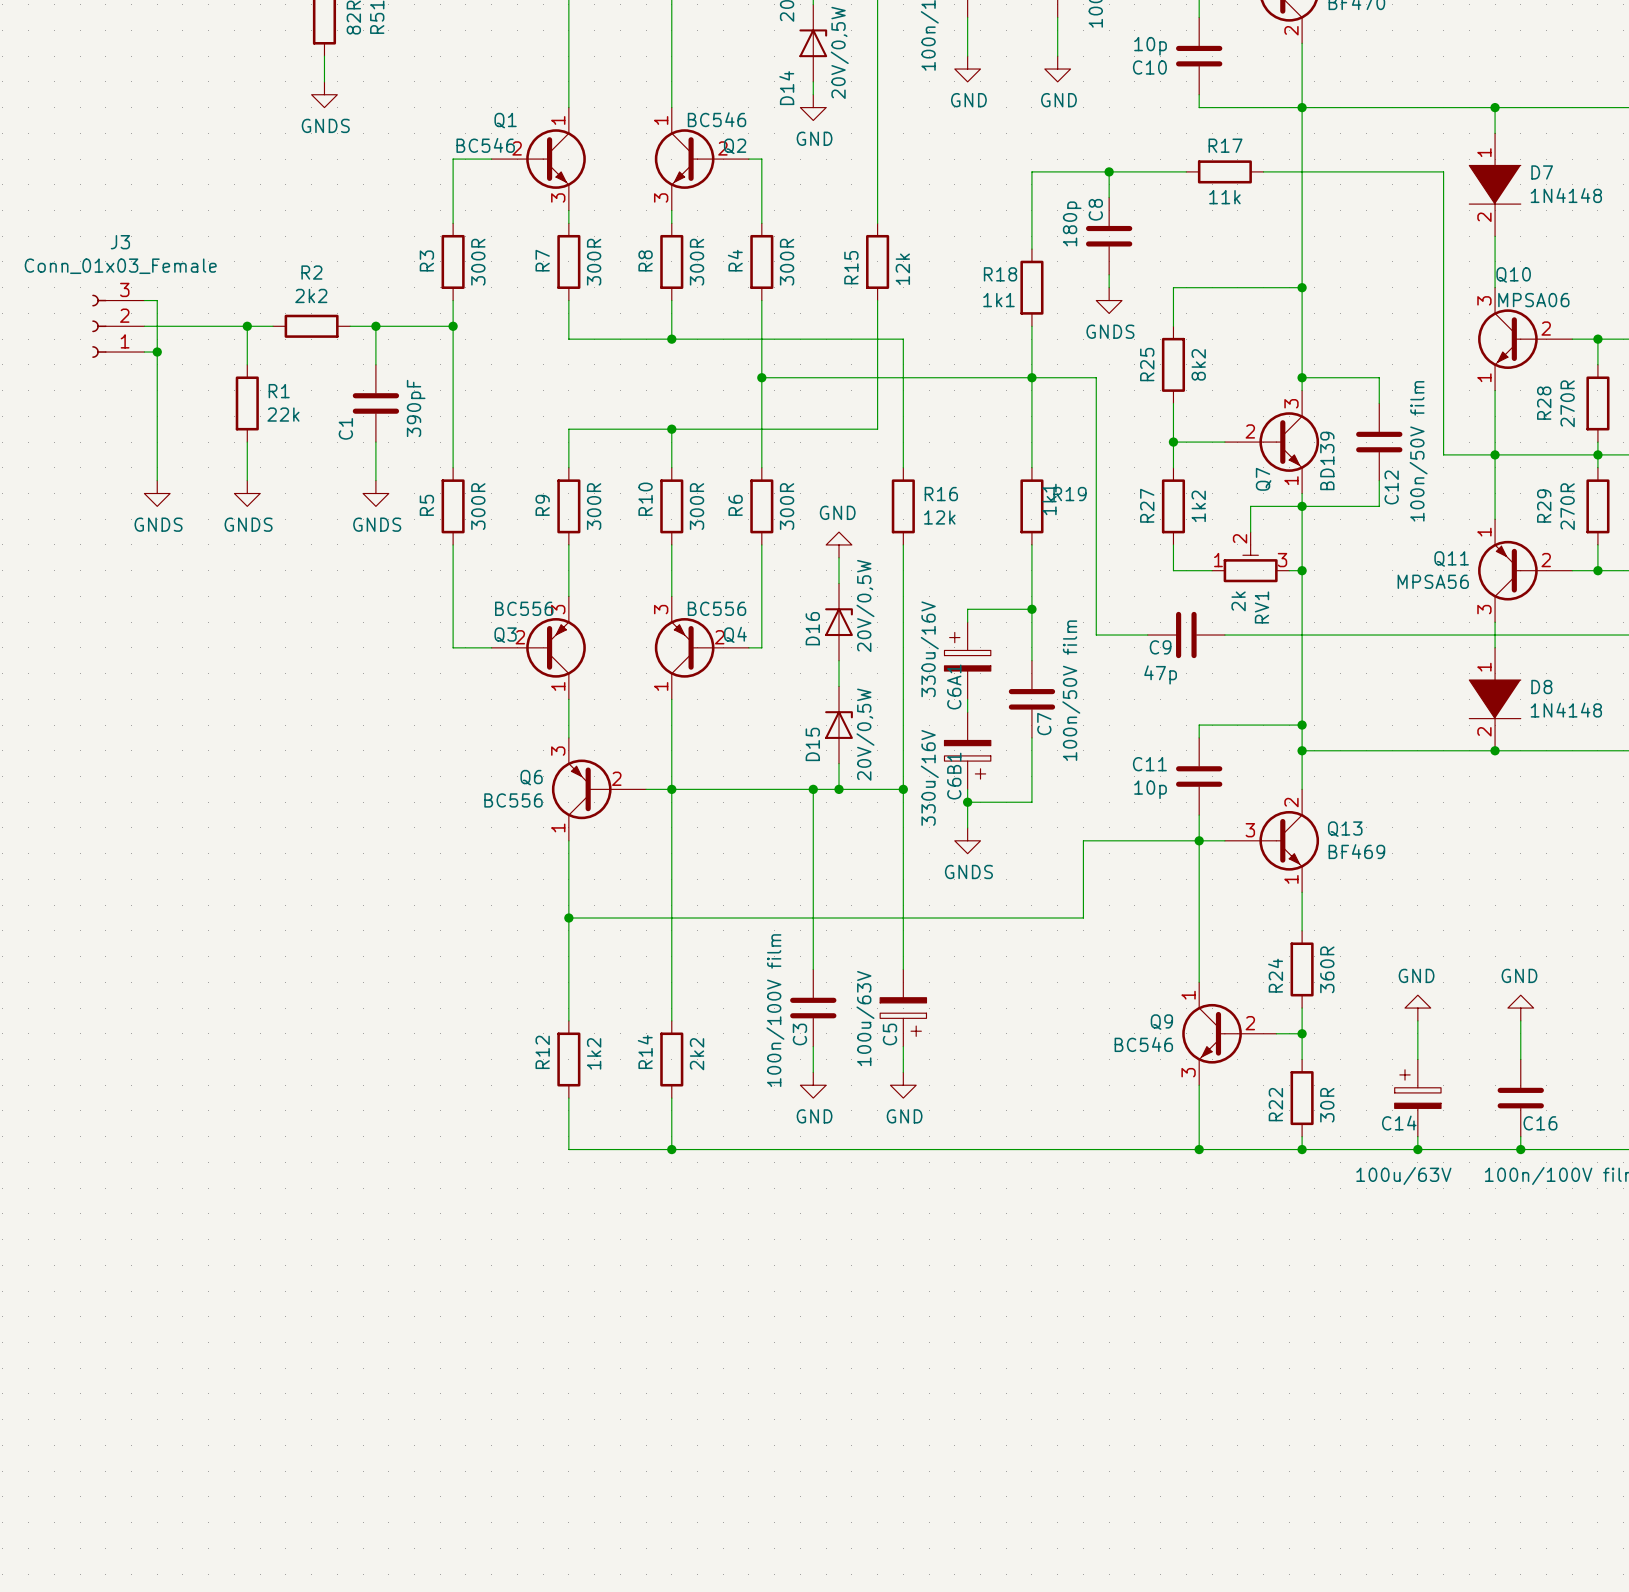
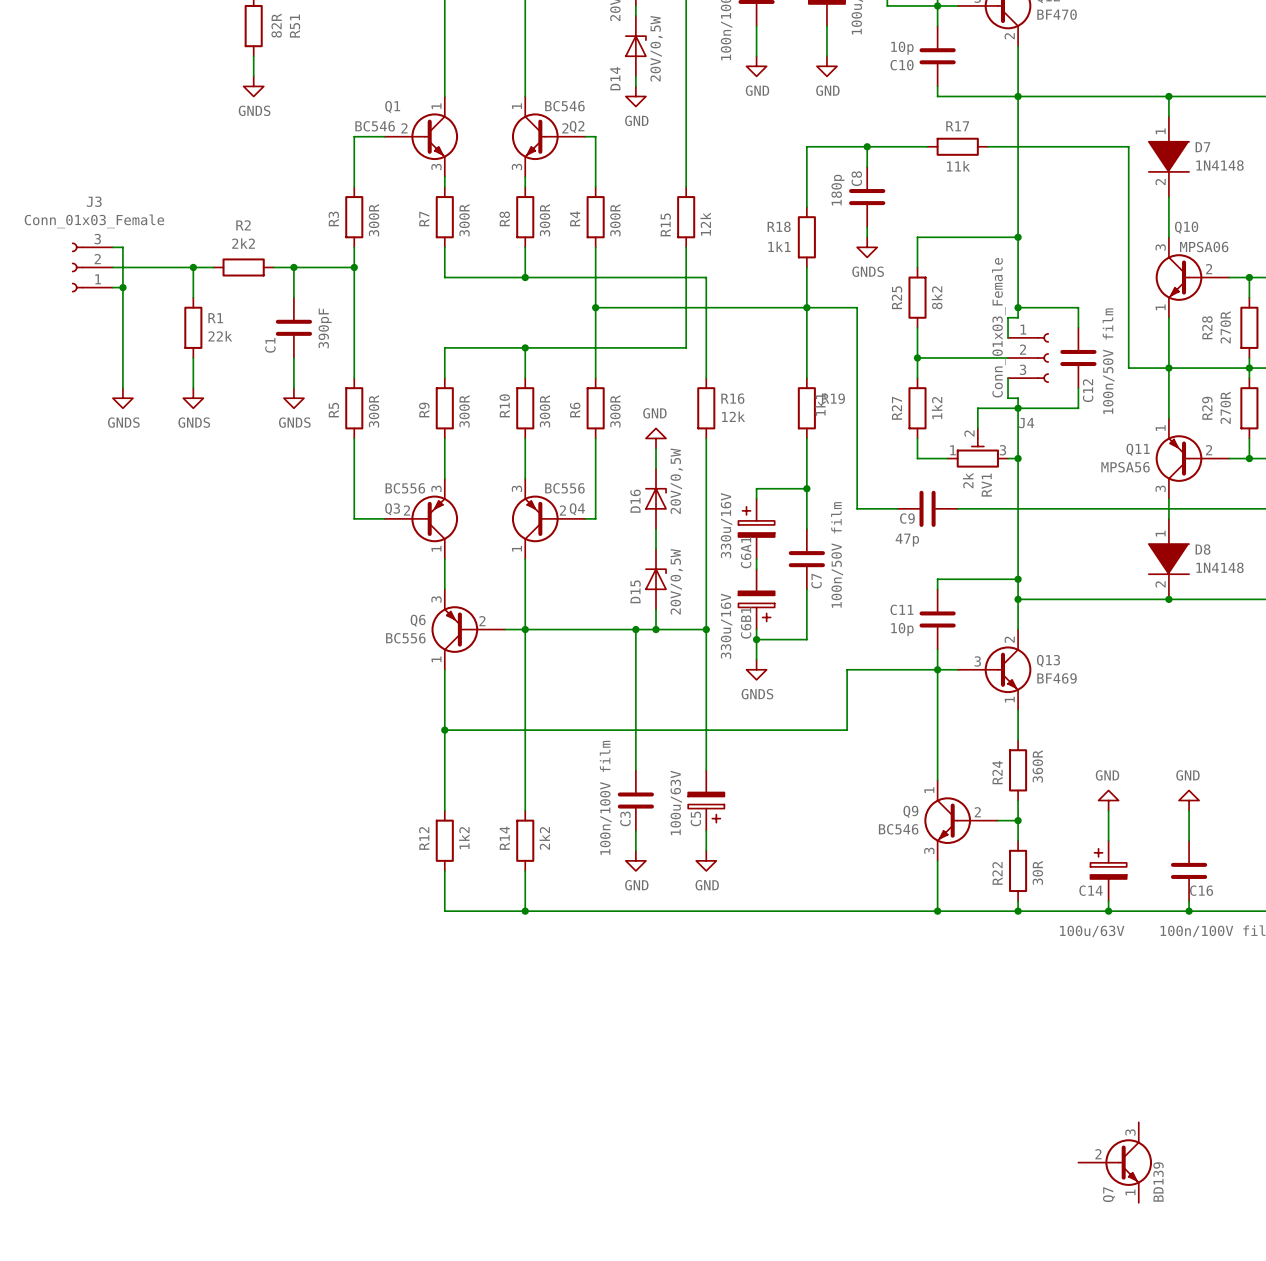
wire: none -> (1018, 317) (1008, 317) (1008, 337)
Q7 position: (1271, 442) -> (1115, 1162)
J4: none -> Conn_01x03_Female (1028, 357)
wire: none -> (1008, 378) (1008, 398) (1018, 398)

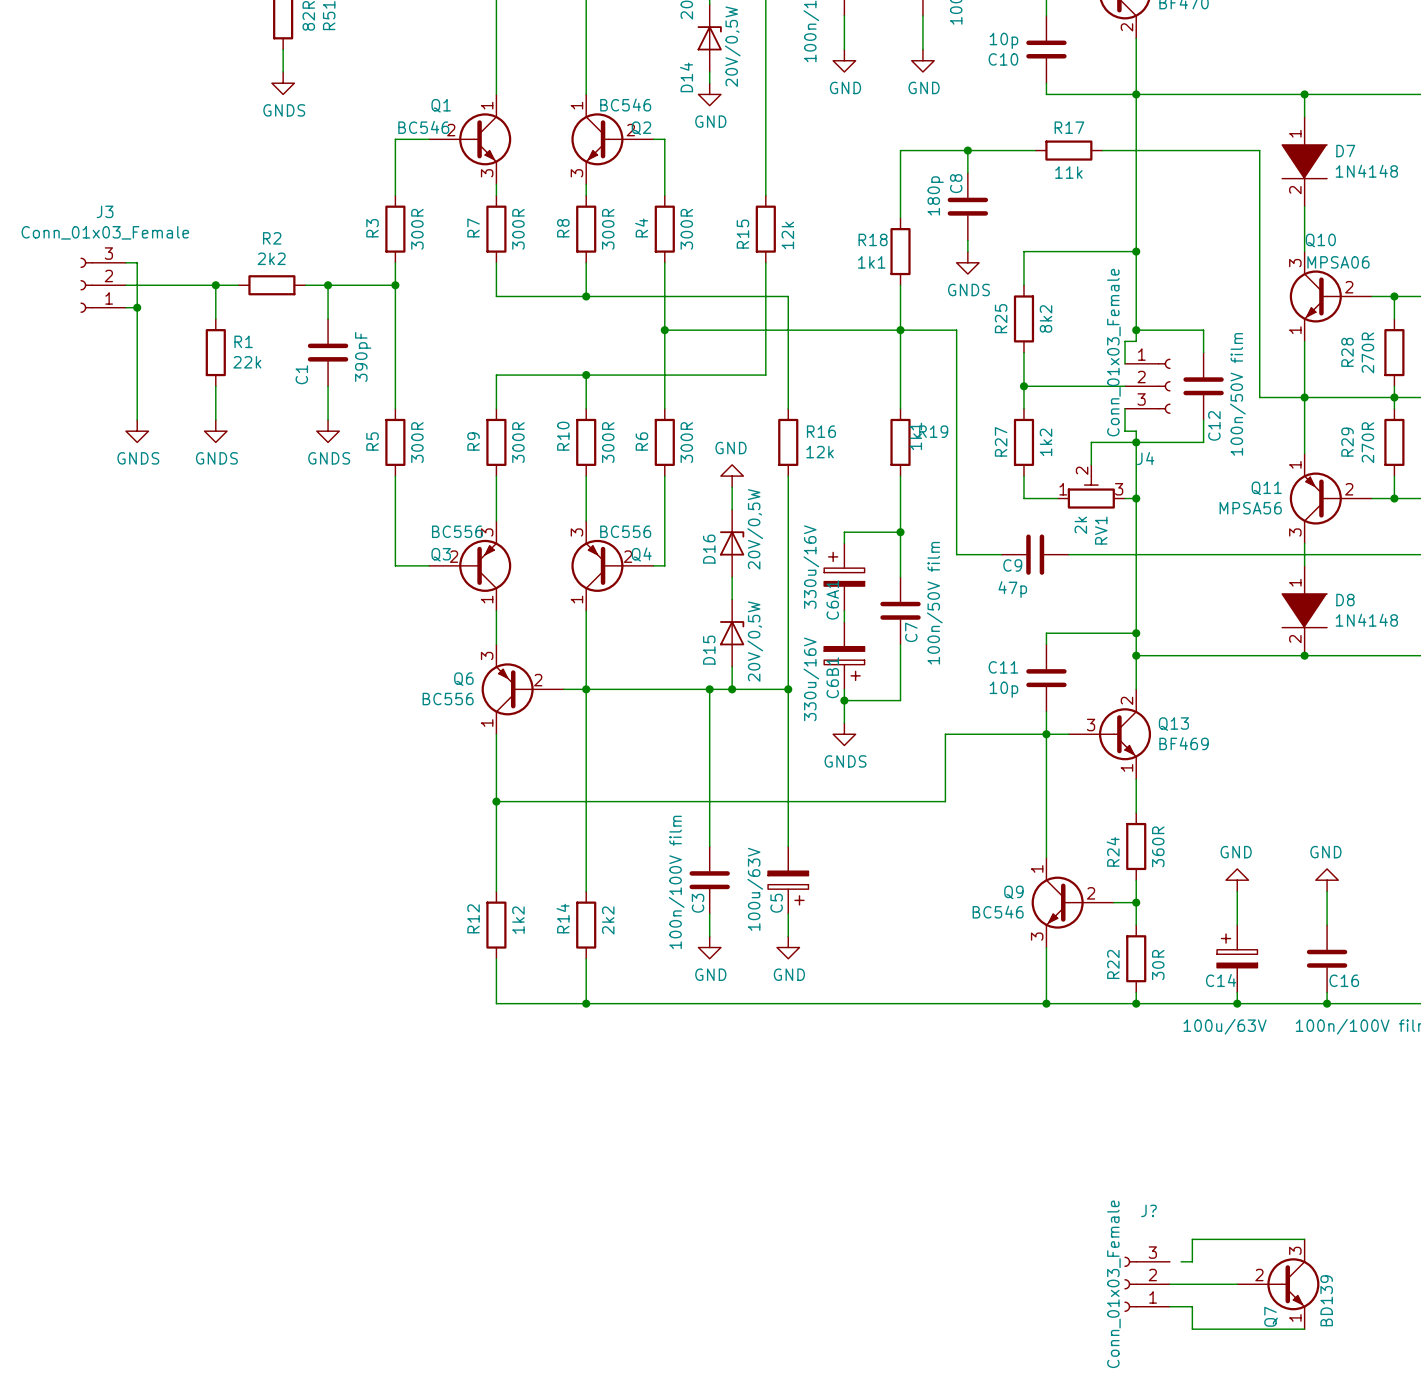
wire: none -> (1304, 1239) (1192, 1239) (1192, 1261) (1181, 1261)
J?: none -> Conn_01x03_Female (1147, 1284)
wire: none -> (1169, 1284) (1237, 1284)
Q7 position: (1115, 1162) -> (1278, 1284)
wire: none -> (1169, 1306) (1192, 1306) (1192, 1329) (1304, 1329)

